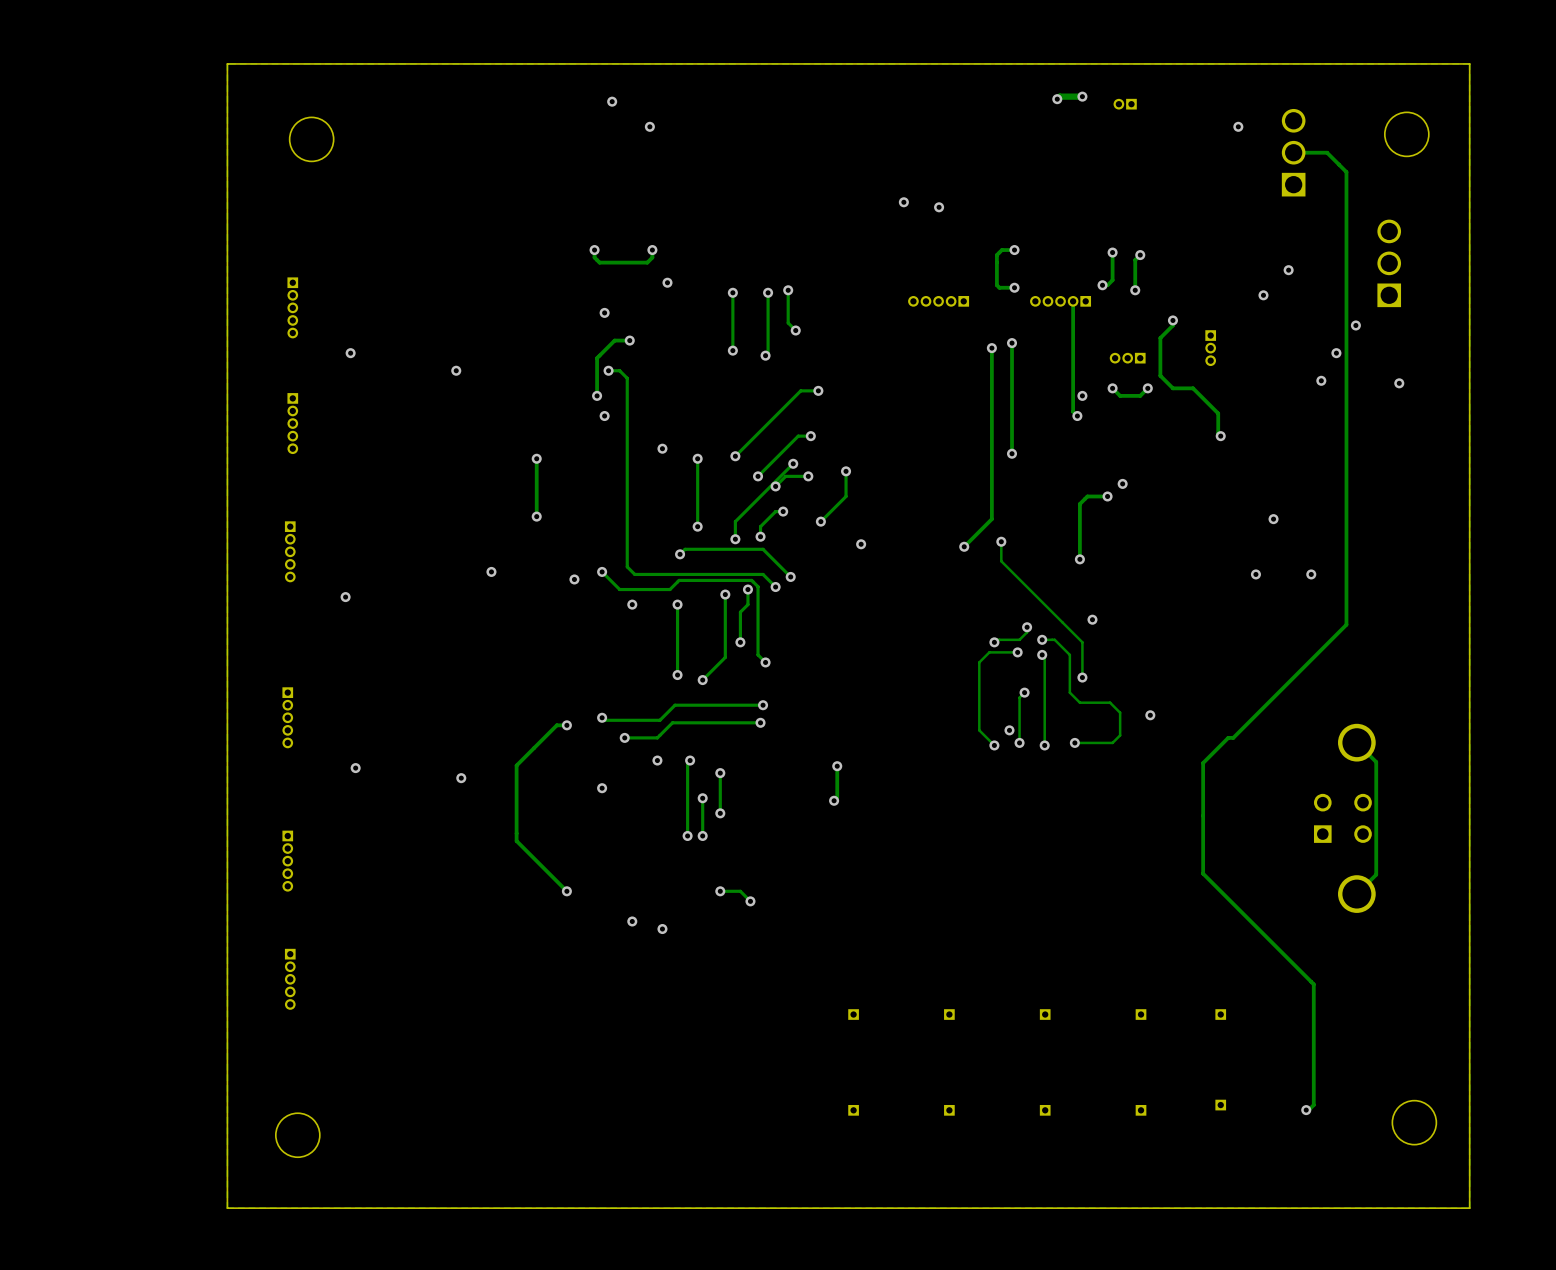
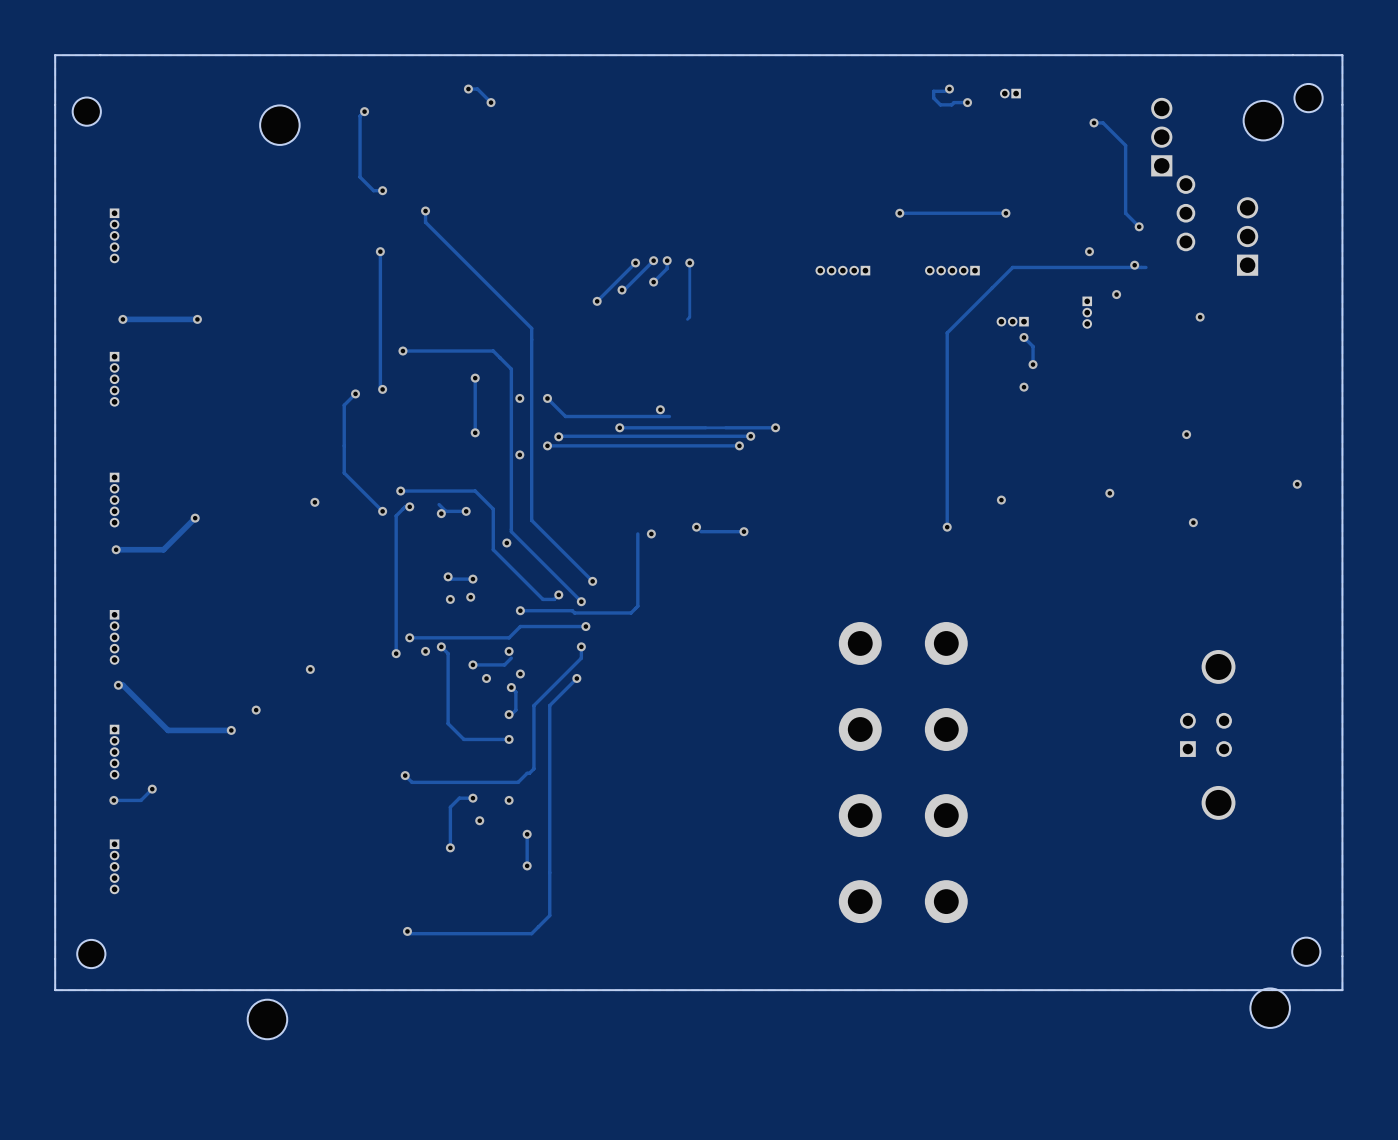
board edge: (1469, 63) (1469, 1208) (227, 1208) (227, 63) (1469, 63) -> (1342, 55) (1342, 990) (55, 990) (55, 55) (1342, 55)
track: (1082, 96) (1059, 96) (1057, 99) -> none
via position: (1082, 96) -> (967, 102)
track: none -> (468, 89) (477, 89) (491, 102)
via: none -> (468, 89)
via: (612, 101) -> none
track: none -> (944, 91) (933, 91) (933, 98) (940, 104) (967, 102)
part: none -> (1308, 98)
via: none -> (491, 102)
part: none -> (86, 111)
track: none -> (364, 111) (360, 116) (360, 177) (373, 190) (382, 190)
via: none -> (364, 111)
via: (649, 126) -> none
via position: (1238, 126) -> (1094, 122)
track: none -> (1094, 122) (1103, 122) (1125, 145) (1125, 213) (1139, 226)
track: (1293, 152) (1327, 152) (1346, 172) (1346, 624) (1233, 737) (1228, 737) (1203, 763) (1203, 873) (1313, 984) (1313, 1105) (1306, 1110) -> none
via: (903, 202) -> none
via: (939, 207) -> none
via: none -> (382, 190)
track: none -> (425, 211) (425, 222) (531, 328) (531, 520) (592, 581)
via: none -> (425, 211)
track: none -> (1005, 213) (899, 213)
via: none -> (1005, 213)
part: none -> (1185, 213)
via: (594, 250) -> none
track: (652, 250) (652, 257) (647, 262) (599, 262) (594, 257) (594, 250) -> none
via: (652, 250) -> none
track: (1014, 250) (1001, 250) (996, 255) (996, 285) (999, 287) (1014, 287) -> none
via position: (1014, 250) -> (899, 213)
track: (1112, 252) (1112, 280) (1107, 285) (1102, 285) -> none
via: (1112, 252) -> none
track: (1140, 255) (1135, 260) (1135, 290) -> none
via: (1140, 255) -> none
part: none -> (114, 235)
via position: (1288, 270) -> (1139, 226)
track: none -> (380, 251) (380, 387) (382, 389)
via: none -> (380, 251)
via: none -> (1089, 251)
via: (667, 282) -> none
via: (1102, 285) -> none
via: (1014, 287) -> none
track: none -> (653, 260) (624, 290) (622, 290)
via: none -> (653, 260)
track: none -> (667, 260) (667, 268) (653, 282)
via: none -> (667, 260)
track: (788, 290) (788, 322) (795, 330) -> none
via: (788, 290) -> none
via: (1135, 290) -> none
track: none -> (635, 262) (597, 301)
via: none -> (635, 262)
track: (732, 292) (732, 350) -> none
via: (732, 292) -> none
track: none -> (1145, 267) (1012, 267) (947, 332) (947, 527)
track: (1073, 301) (1073, 411) (1077, 416) -> none
part: (292, 307) -> none
via: (604, 312) -> none
via: none -> (653, 282)
track: (1172, 320) (1172, 325) (1160, 338) (1160, 375) (1172, 388) (1193, 388) (1218, 413) (1218, 433) (1220, 436) -> none
via: (1172, 320) -> none
via: none -> (622, 290)
via: (1355, 325) -> none
via: none -> (1116, 294)
via: (795, 330) -> none
via: none -> (597, 301)
track: (629, 340) (614, 340) (597, 358) (597, 395) -> none
via: (629, 340) -> none
track: (1012, 343) (1012, 453) -> none
via: (1012, 343) -> none
track: (991, 348) (991, 519) (964, 546) -> none
via: (991, 348) -> none
via: (732, 350) -> none
via: (350, 353) -> none
via: none -> (122, 319)
track: none -> (197, 319) (122, 319)
via: none -> (197, 319)
via: (765, 355) -> none
via position: (456, 370) -> (402, 351)
track: (608, 370) (619, 370) (627, 378) (627, 566) (634, 574) (763, 574) (775, 587) -> none
via: (608, 370) -> none
track: none -> (1024, 337) (1033, 346) (1033, 364)
via: none -> (1024, 337)
via: (1321, 380) -> none
via: (1399, 383) -> none
via: (1112, 388) -> none
track: (1147, 388) (1140, 395) (1120, 395) (1112, 388) -> none
via: (1147, 388) -> none
track: none -> (402, 351) (493, 351) (511, 369) (511, 531) (581, 601)
track: (818, 390) (800, 390) (735, 456) -> none
via: (818, 390) -> none
via: (597, 395) -> none
via: (1082, 395) -> none
via: none -> (1033, 364)
via: (604, 416) -> none
via: (1077, 416) -> none
track: none -> (475, 378) (475, 432)
via: none -> (475, 378)
part: none -> (114, 379)
part: (292, 423) -> none
via: none -> (1024, 387)
via: none -> (382, 389)
track: (810, 436) (798, 436) (758, 476) -> none
via: (810, 436) -> none
via: (1220, 436) -> none
track: none -> (355, 393) (344, 405) (344, 472) (382, 511)
via: none -> (355, 393)
via: none -> (519, 398)
track: none -> (547, 398) (565, 416) (669, 416)
via: none -> (547, 398)
via: (662, 448) -> none
via: (1012, 453) -> none
track: (536, 458) (536, 516) -> none
via: (536, 458) -> none
track: (697, 458) (697, 526) -> none
via position: (697, 458) -> (619, 427)
track: (793, 463) (735, 521) (735, 539) -> none
via: (793, 463) -> none
track: (846, 471) (846, 496) (820, 521) -> none
via: (846, 471) -> none
via: (758, 476) -> none
track: (785, 476) (775, 486) -> (705, 427) (619, 427)
via: (808, 476) -> none
track: none -> (775, 427) (725, 427)
via: none -> (775, 427)
via: none -> (475, 432)
via: (1122, 483) -> none
via: none -> (1186, 434)
track: none -> (750, 436) (558, 436)
via: none -> (750, 436)
via: none -> (558, 436)
via: (775, 486) -> none
via: none -> (547, 445)
track: none -> (739, 445) (547, 445)
via: none -> (739, 445)
track: (1107, 496) (1087, 496) (1079, 504) (1079, 559) -> none
via: (1107, 496) -> none
via: none -> (519, 454)
track: (783, 511) (775, 511) (760, 526) (760, 536) -> none
via: (783, 511) -> none
via: (536, 516) -> none
via: (1273, 519) -> none
via: (820, 521) -> none
via: (697, 526) -> none
via: (760, 536) -> none
via: (735, 539) -> none
via: none -> (1297, 484)
track: (1001, 541) (1001, 561) (1082, 642) (1082, 677) -> none
via: (1001, 541) -> none
via: (861, 544) -> none
track: none -> (400, 491) (475, 491) (493, 509) (493, 549) (542, 599) (554, 599) (558, 594)
via: none -> (400, 491)
via: (964, 546) -> none
via: none -> (1109, 493)
part: (290, 551) -> none
track: (680, 554) (685, 549) (763, 549) (790, 576) -> none
via: (680, 554) -> none
part: none -> (114, 500)
via: none -> (1001, 500)
via: (1079, 559) -> none
track: none -> (439, 504) (445, 511) (466, 511)
track: none -> (409, 506) (405, 506) (396, 515) (396, 653)
via: none -> (409, 506)
via: none -> (382, 511)
via: none -> (466, 511)
track: (602, 571) (619, 589) (670, 589) (679, 580) (751, 580) (758, 586) (758, 654) (765, 662) -> none
via: (602, 571) -> none
via: (1255, 574) -> none
via position: (1311, 574) -> (1193, 522)
track: none -> (195, 518) (163, 549) (116, 549)
via: none -> (195, 518)
via: (790, 576) -> none
via: (574, 579) -> none
via: none -> (947, 527)
track: (747, 589) (747, 604) (740, 612) (740, 642) -> none
via: (747, 589) -> none
track: none -> (743, 531) (701, 531)
via: none -> (743, 531)
track: none -> (637, 533) (637, 606) (631, 612) (520, 610)
track: (725, 594) (725, 657) (702, 680) -> none
via position: (345, 597) -> (314, 502)
via: none -> (506, 542)
via: (632, 604) -> none
track: (677, 604) (677, 675) -> none
via: (677, 604) -> none
via: none -> (116, 549)
via: (1092, 619) -> none
track: (1027, 627) (1027, 632) (1019, 639) (996, 639) (994, 642) -> none
via: (1027, 627) -> none
track: (1042, 639) (1054, 639) (1069, 654) (1069, 692) (1079, 702) (1110, 702) (1120, 712) (1120, 735) (1112, 742) (1074, 742) -> none
via: (1042, 639) -> none
track: none -> (448, 576) (450, 579) (472, 579)
via: none -> (448, 576)
via: (740, 642) -> none
via: (994, 642) -> none
via: none -> (472, 579)
via: none -> (592, 581)
track: (1017, 652) (989, 652) (979, 662) (979, 730) (994, 745) -> none
via: (1017, 652) -> none
track: (1042, 654) (1044, 657) (1044, 745) -> none
via: (1042, 654) -> none
via: none -> (558, 594)
via: (765, 662) -> none
via: none -> (470, 597)
via: none -> (450, 599)
via: none -> (581, 601)
via: (677, 675) -> none
via: (1082, 677) -> none
via: none -> (520, 610)
via: (702, 680) -> none
track: (1024, 692) (1019, 697) (1019, 742) -> none
via: (1024, 692) -> none
track: none -> (585, 626) (520, 626) (509, 637) (409, 637)
via: none -> (585, 626)
track: (763, 705) (675, 705) (659, 720) (604, 720) (602, 717) -> none
via: (763, 705) -> none
part: none -> (114, 637)
via: none -> (409, 637)
via: (1150, 715) -> none
part: none -> (860, 643)
part: none -> (946, 643)
part: (287, 717) -> none
via: (602, 717) -> none
track: none -> (441, 646) (448, 653) (448, 723) (463, 739) (509, 739)
via: none -> (441, 646)
track: none -> (581, 646) (581, 658) (533, 705) (533, 768) (518, 782) (411, 782) (405, 775)
via: none -> (581, 646)
track: (760, 722) (672, 722) (657, 737) (624, 737) -> none
via: (760, 722) -> none
via: none -> (425, 651)
track: (566, 725) (556, 725) (516, 765) (516, 841) (566, 891) -> none
via: none -> (396, 653)
via: (1009, 730) -> none
track: none -> (511, 658) (504, 664) (472, 664)
via: (624, 737) -> none
via: none -> (472, 664)
via: (1019, 742) -> none
via: (1074, 742) -> none
track: (1356, 742) (1376, 762) (1376, 874) (1356, 894) -> none
via: (994, 745) -> none
via: (1044, 745) -> none
via: none -> (520, 673)
via: none -> (486, 678)
track: none -> (576, 678) (549, 705) (549, 915) (531, 933) (409, 933) (407, 931)
via: none -> (576, 678)
via: (657, 760) -> none
track: (690, 760) (687, 763) (687, 835) -> none
via: (690, 760) -> none
track: none -> (118, 685) (122, 685) (168, 730) (231, 730)
via: none -> (118, 685)
track: none -> (511, 687) (515, 692) (515, 710) (509, 714)
via: none -> (511, 687)
track: (837, 766) (837, 797) (834, 800) -> none
via: (837, 766) -> none
via position: (355, 768) -> (310, 669)
track: (720, 773) (720, 813) -> none
via: (720, 773) -> none
via: (461, 778) -> none
via: (602, 788) -> none
via: none -> (256, 710)
via: none -> (509, 714)
track: (702, 798) (702, 835) -> none
via: (702, 798) -> none
via: (834, 800) -> none
part: none -> (860, 729)
part: none -> (946, 729)
via: none -> (231, 730)
via: (720, 813) -> none
via: none -> (509, 739)
via: (687, 835) -> none
via: (702, 835) -> none
part: none -> (114, 752)
part: (287, 861) -> none
via: none -> (405, 775)
track: none -> (152, 789) (140, 800) (111, 800)
via: none -> (152, 789)
track: none -> (472, 798) (459, 798) (450, 807) (450, 847)
via: none -> (472, 798)
via: none -> (113, 800)
track: (720, 891) (740, 891) (750, 901) -> none
via: (720, 891) -> none
via: (750, 901) -> none
part: none -> (860, 815)
part: none -> (946, 815)
via: none -> (479, 820)
via: (632, 921) -> none
track: none -> (527, 834) (527, 865)
via: none -> (527, 834)
via: (662, 929) -> none
via: none -> (450, 847)
via: none -> (527, 865)
part: none -> (114, 866)
part: (290, 979) -> none
part: none -> (860, 901)
part: none -> (946, 901)
part: (853, 1014) -> none
part: (949, 1014) -> none
part: (1045, 1014) -> none
part: (1141, 1014) -> none
part: (1220, 1014) -> none
via: none -> (407, 931)
part: none -> (1306, 951)
part: none -> (91, 953)
part: (1220, 1105) -> none
part: (853, 1110) -> none
part: (949, 1110) -> none
part: (1045, 1110) -> none
part: (1141, 1110) -> none
via: (1306, 1110) -> none

